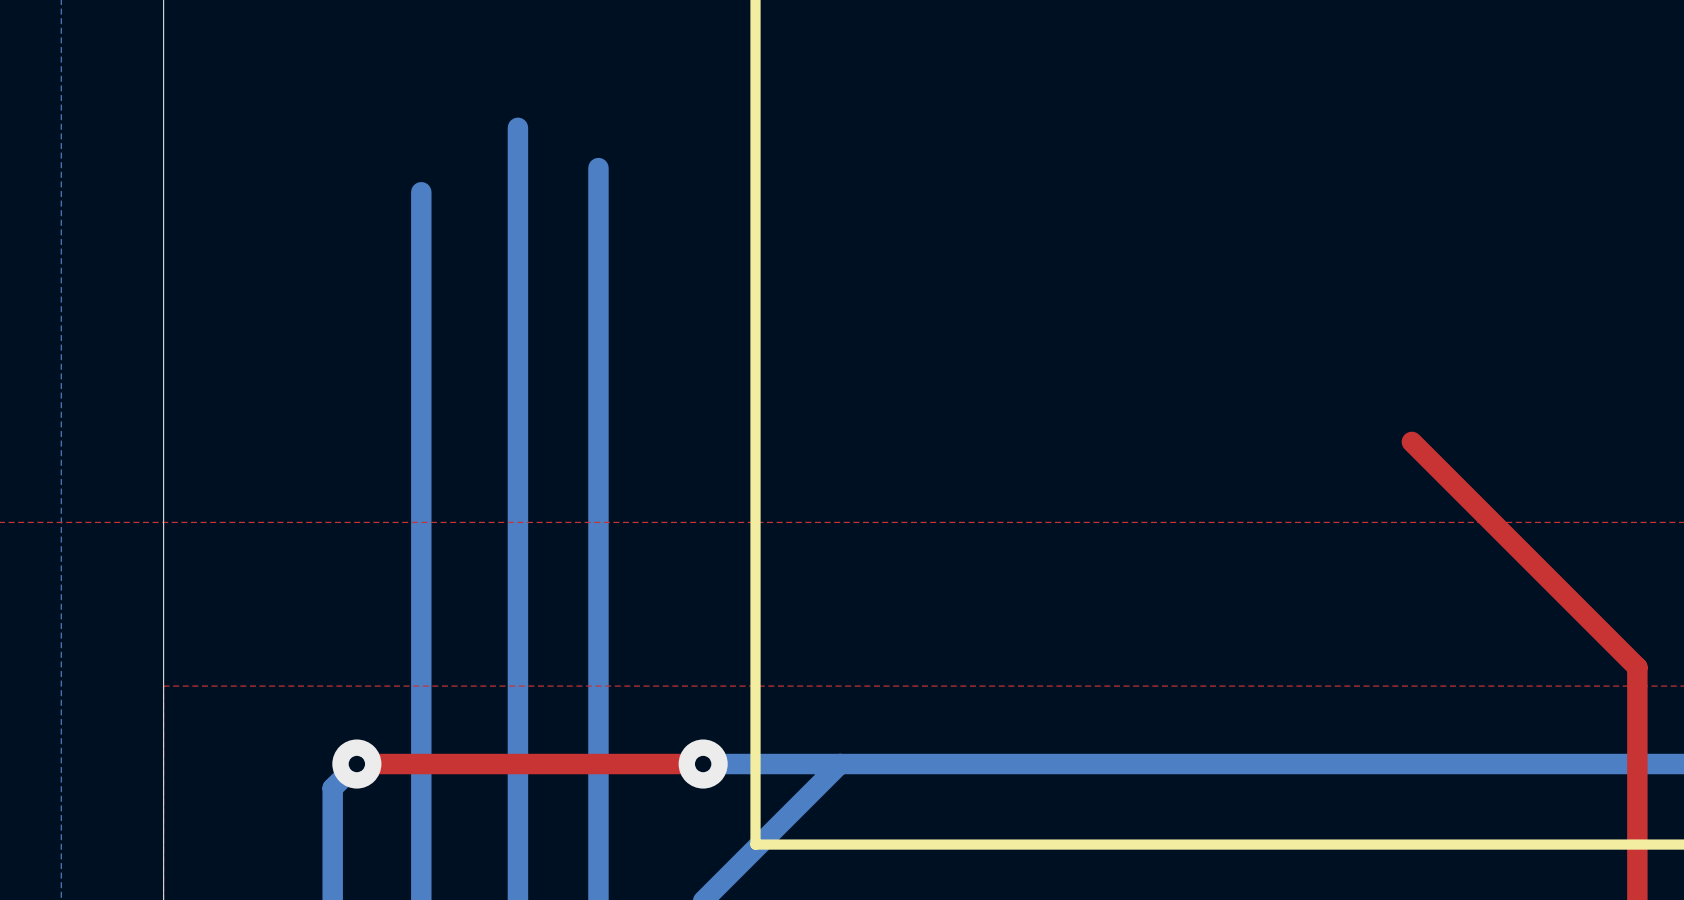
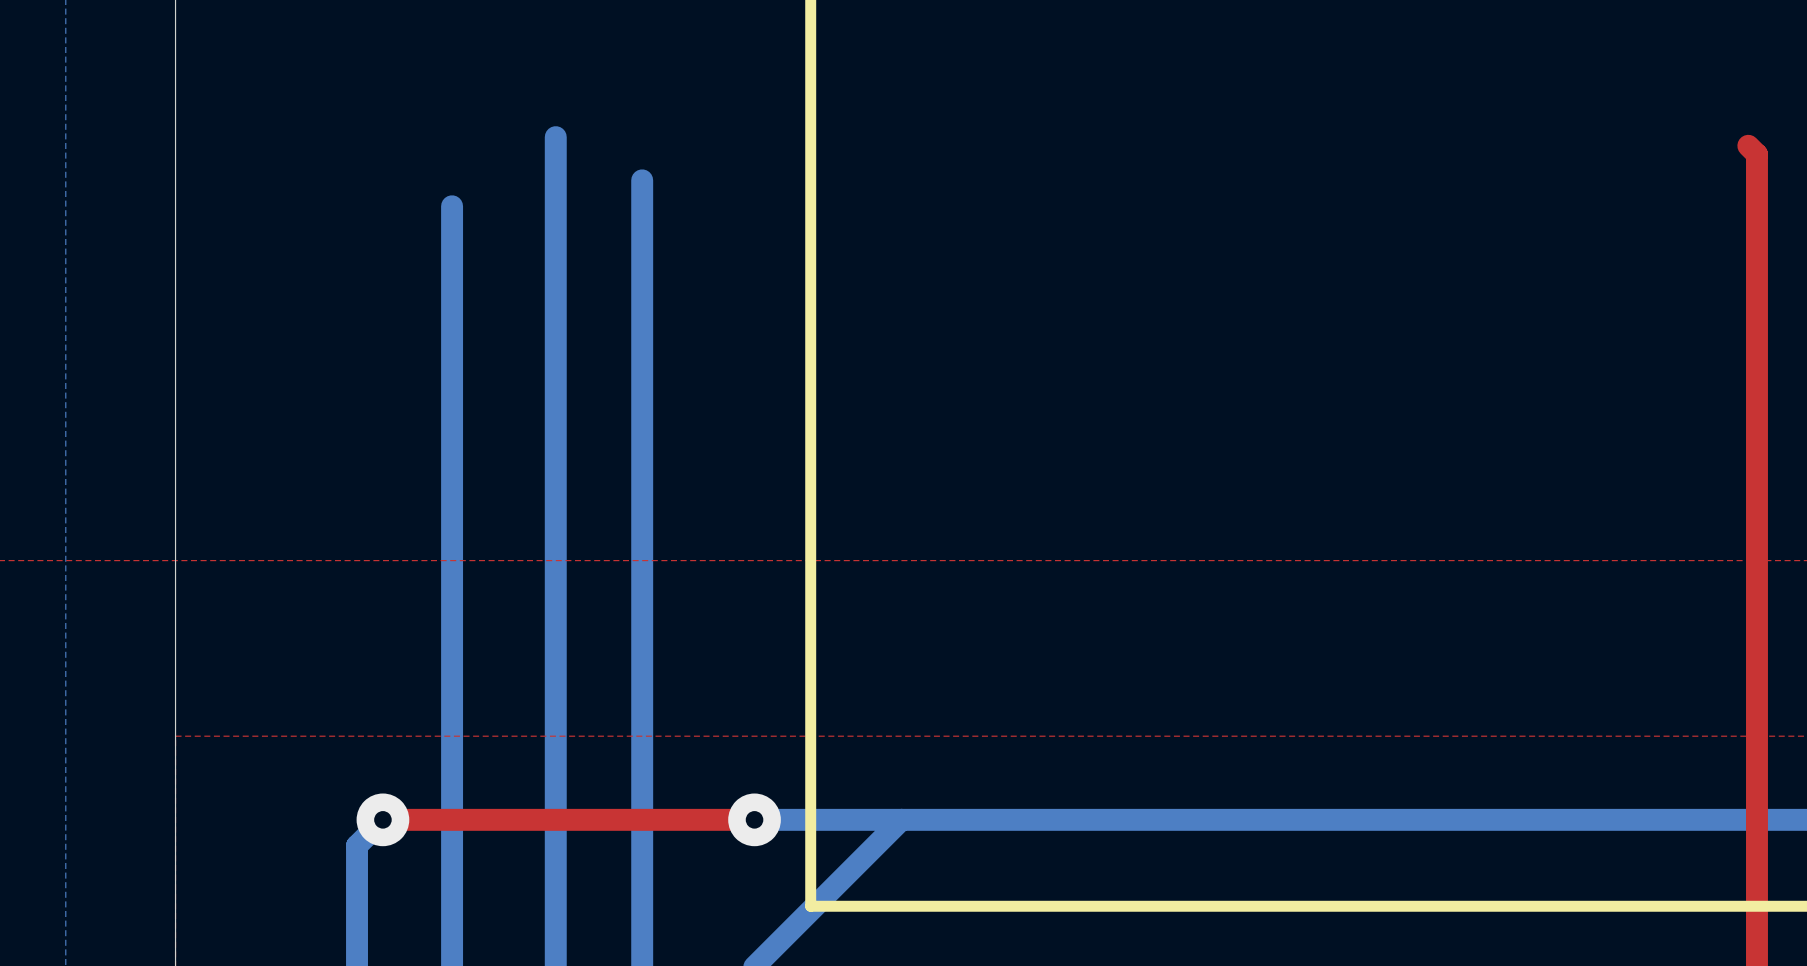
top track: (1411, 441) (1637, 667) -> (1748, 145) (1756, 154) (1756, 716)

